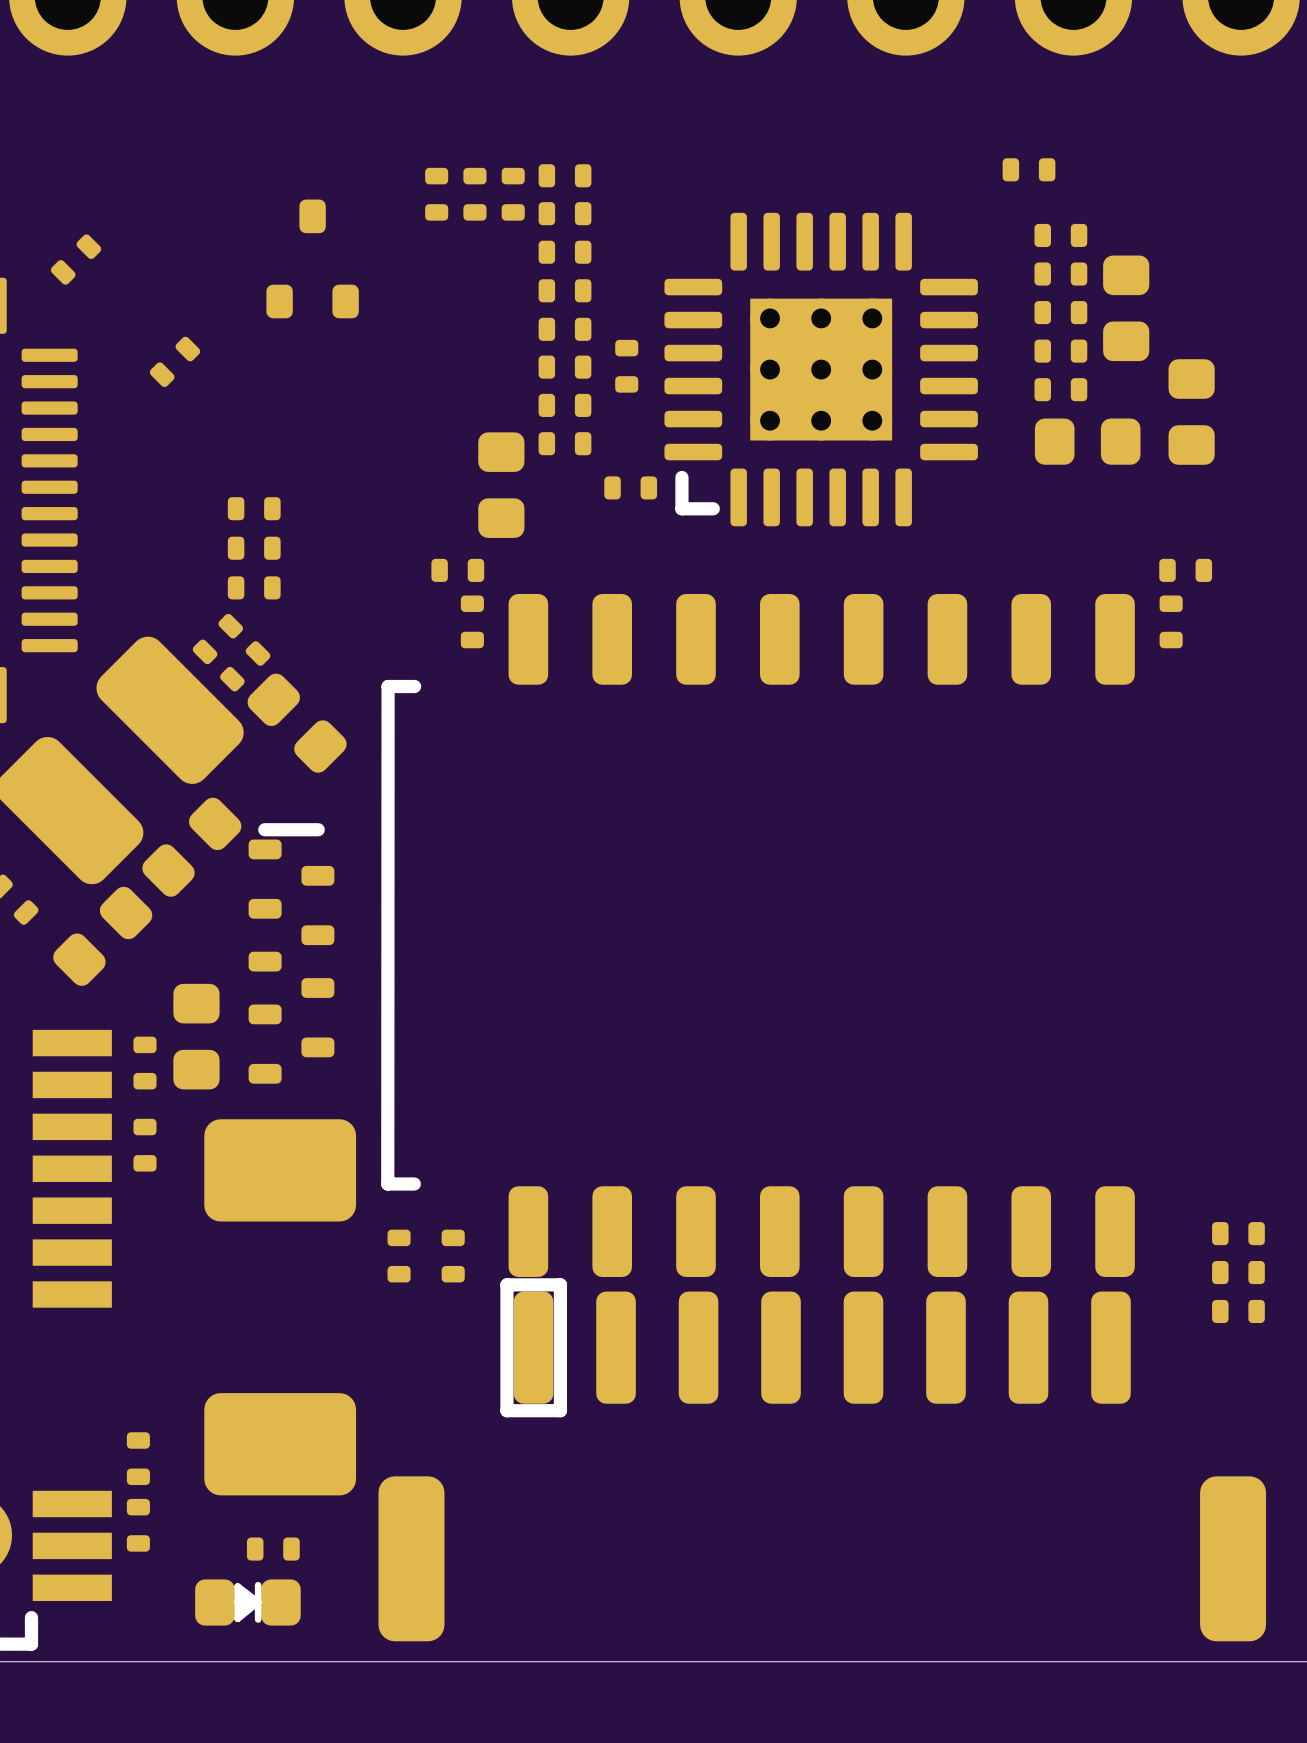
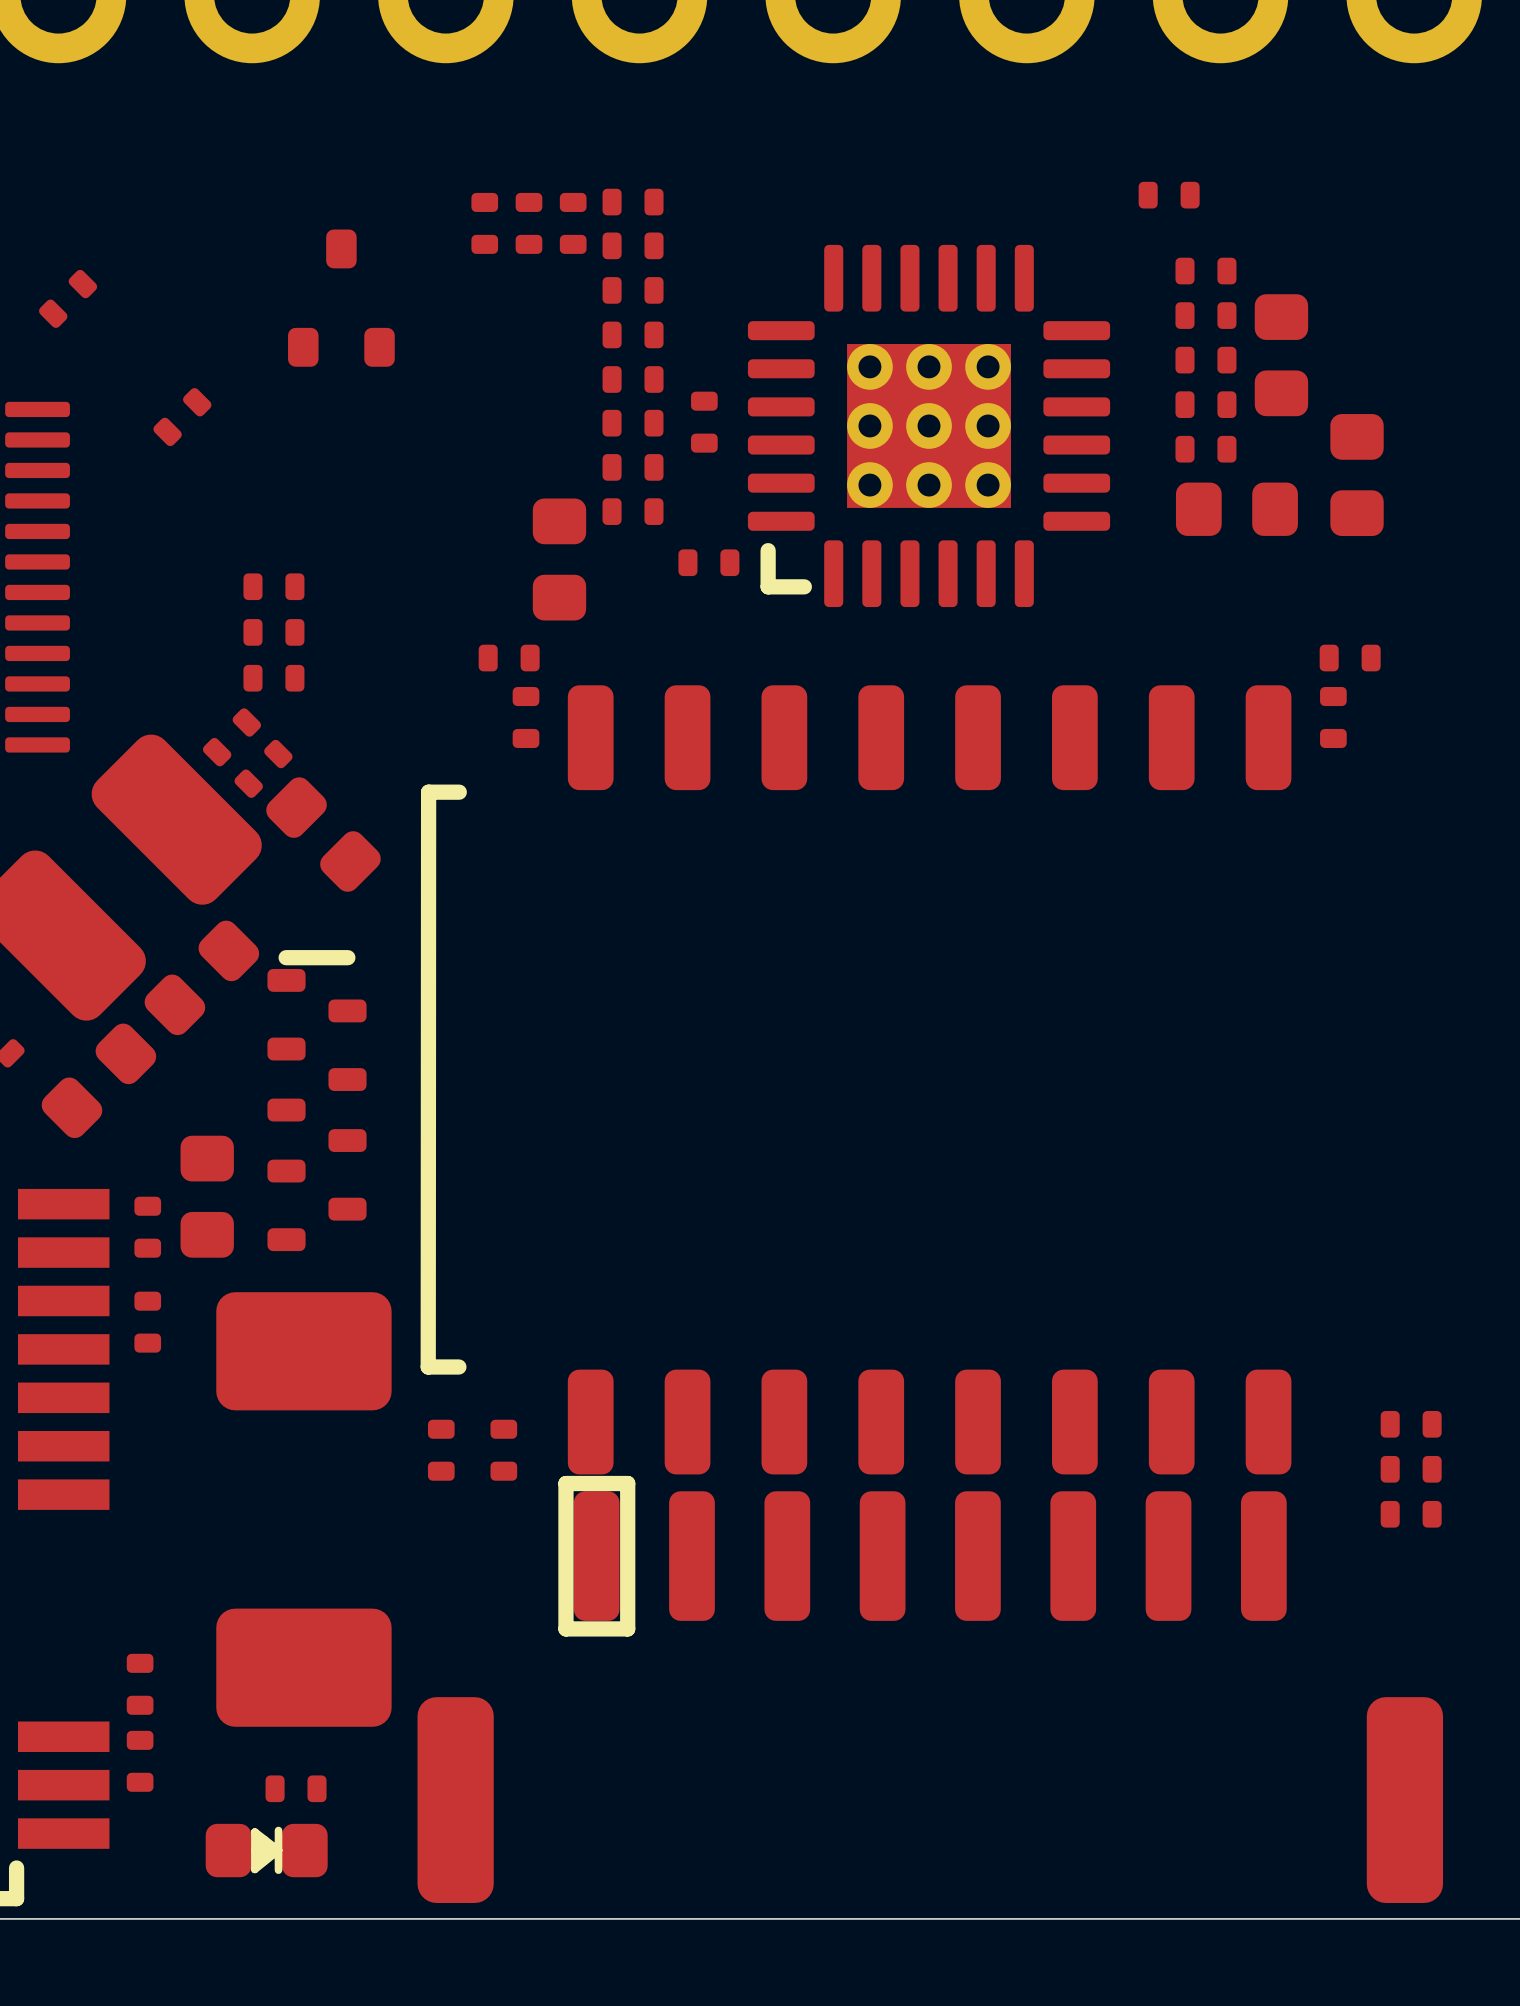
part footprint: [378, 1291, 1267, 1642] -> [417, 1491, 1444, 1903]

